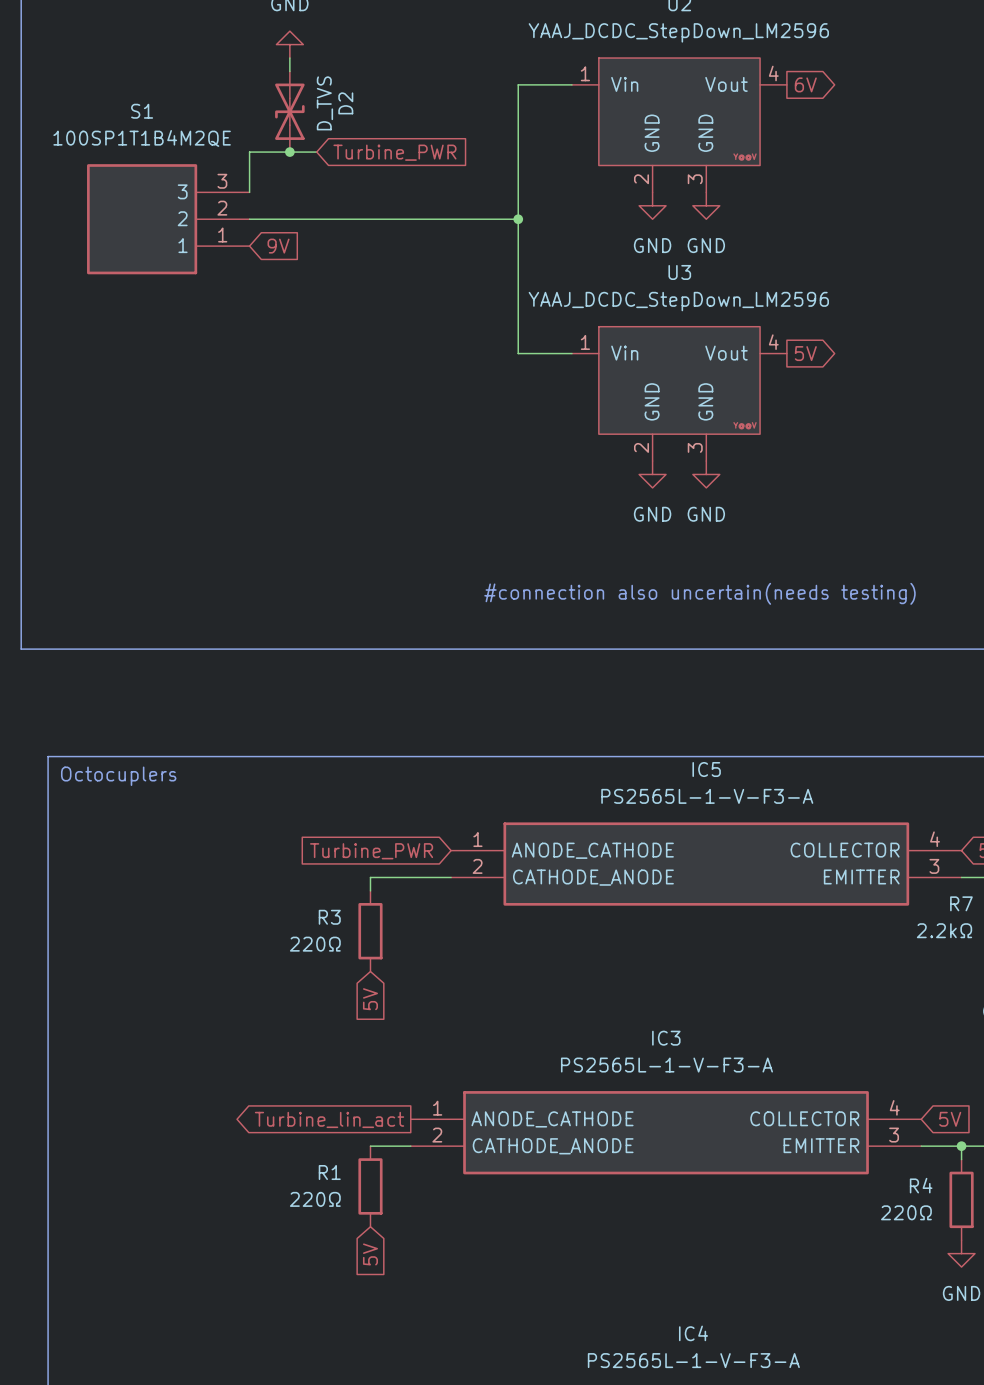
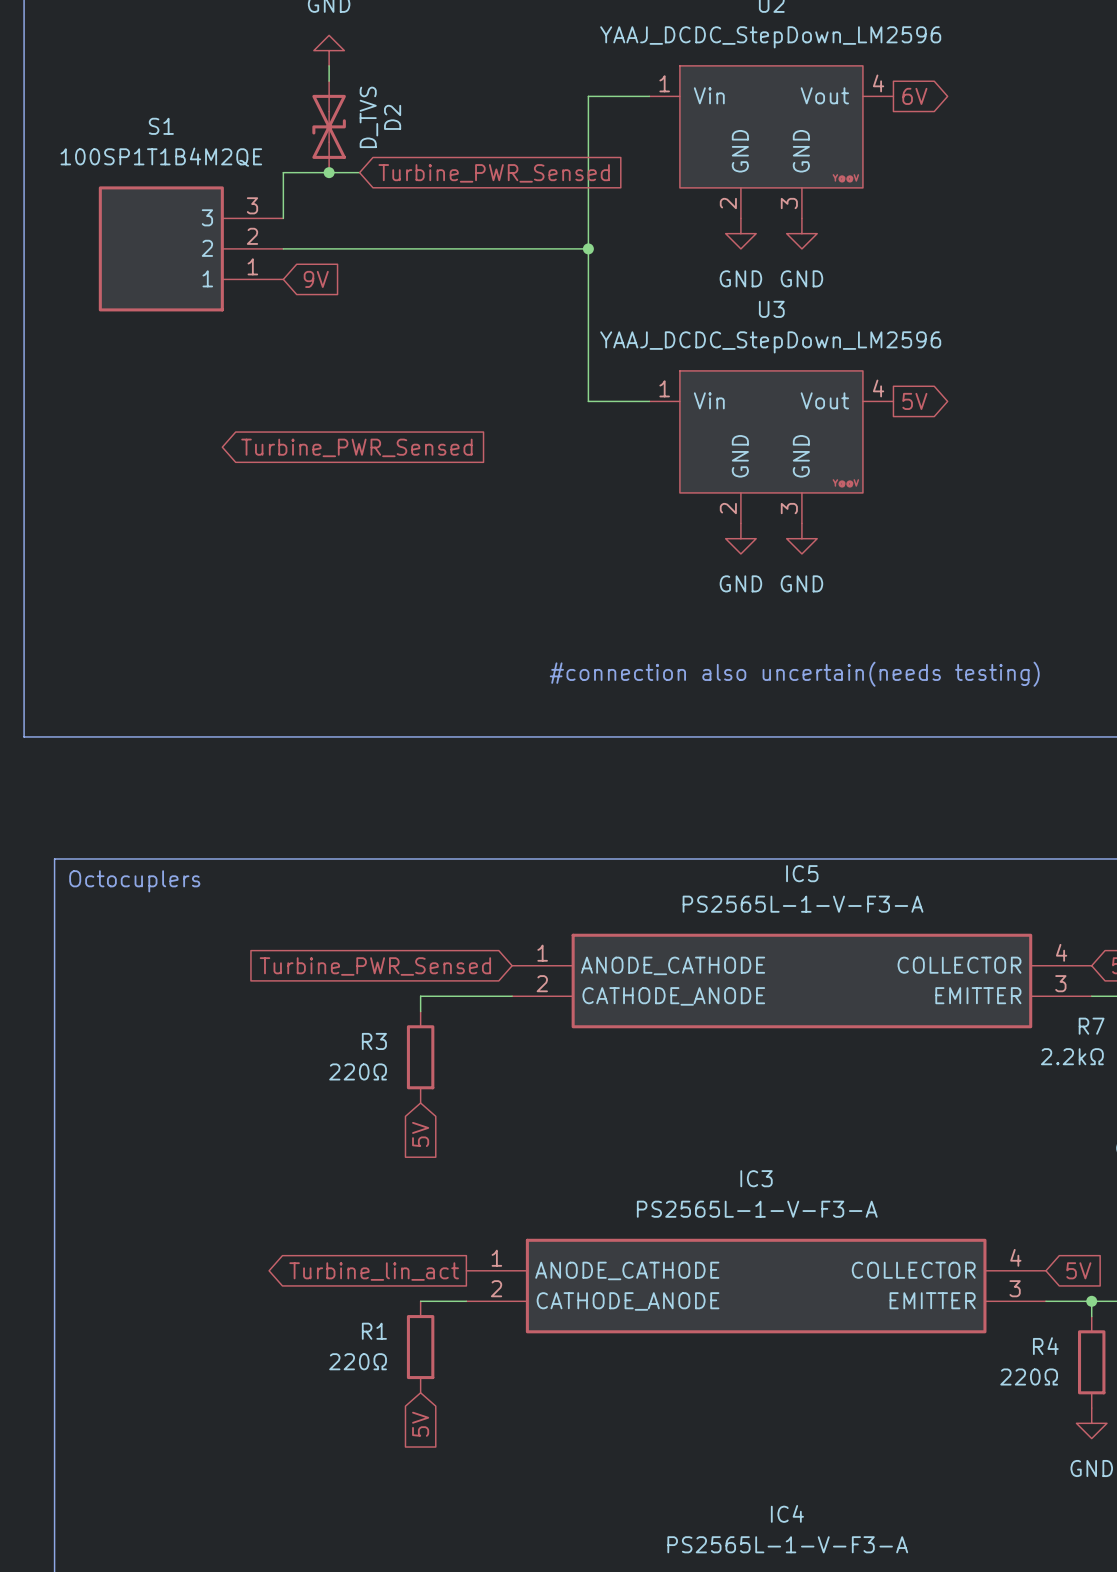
global label: Turbine_PWR (394, 152) -> Turbine_PWR_Sensed (494, 173)
global label: none -> Turbine_PWR_Sensed (356, 447)
global label: Turbine_PWR (371, 851) -> Turbine_PWR_Sensed (375, 966)

